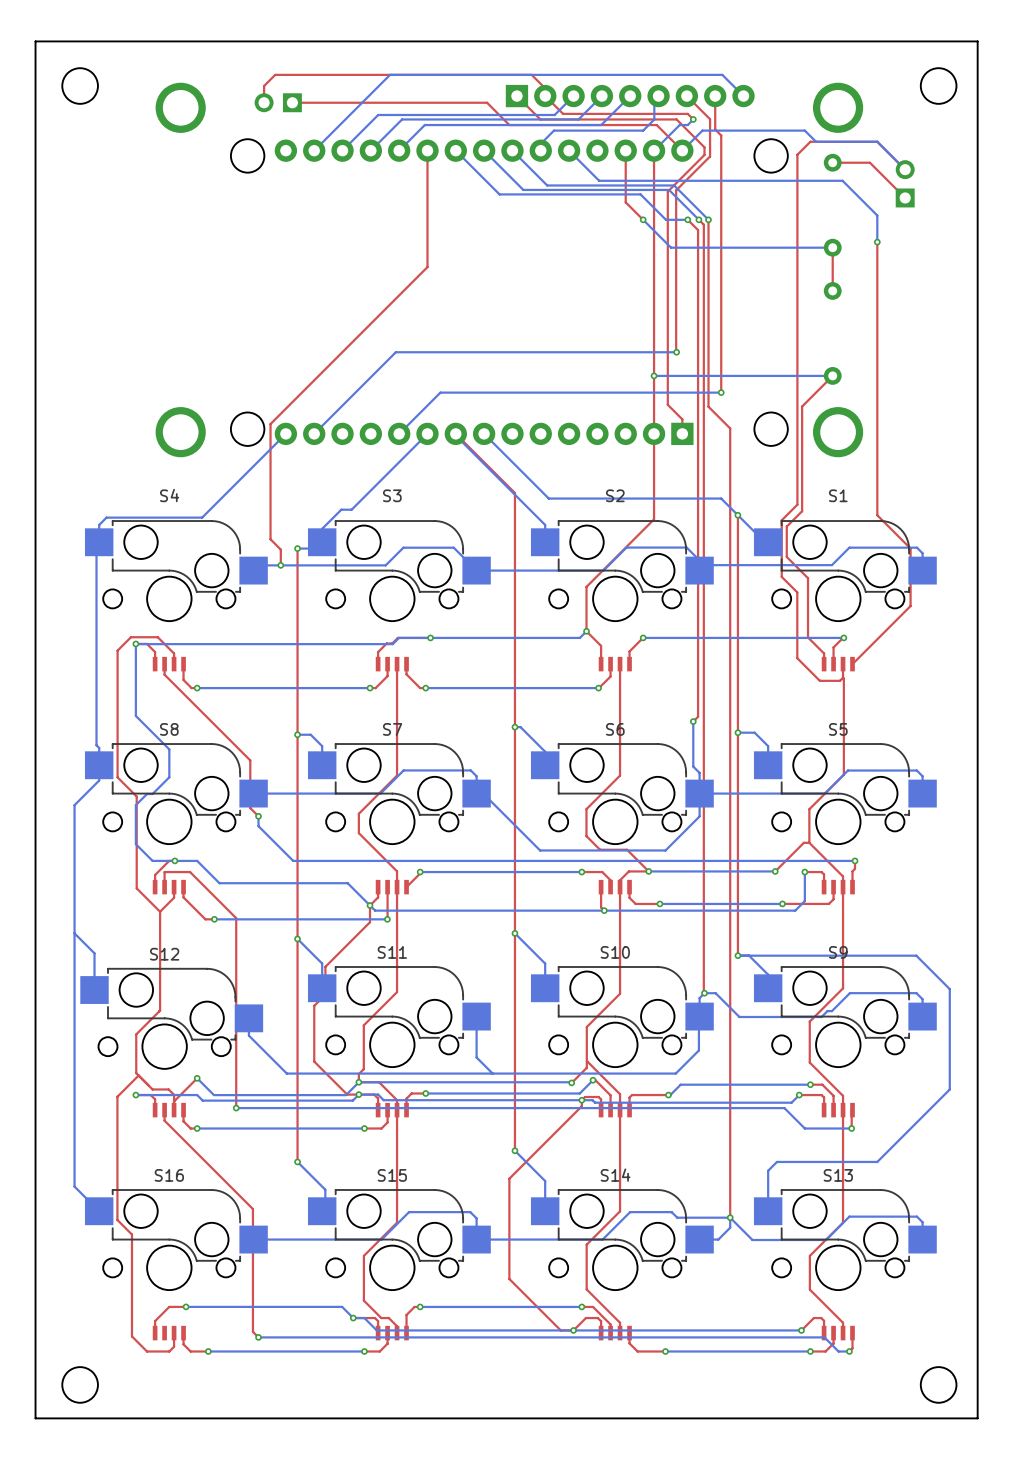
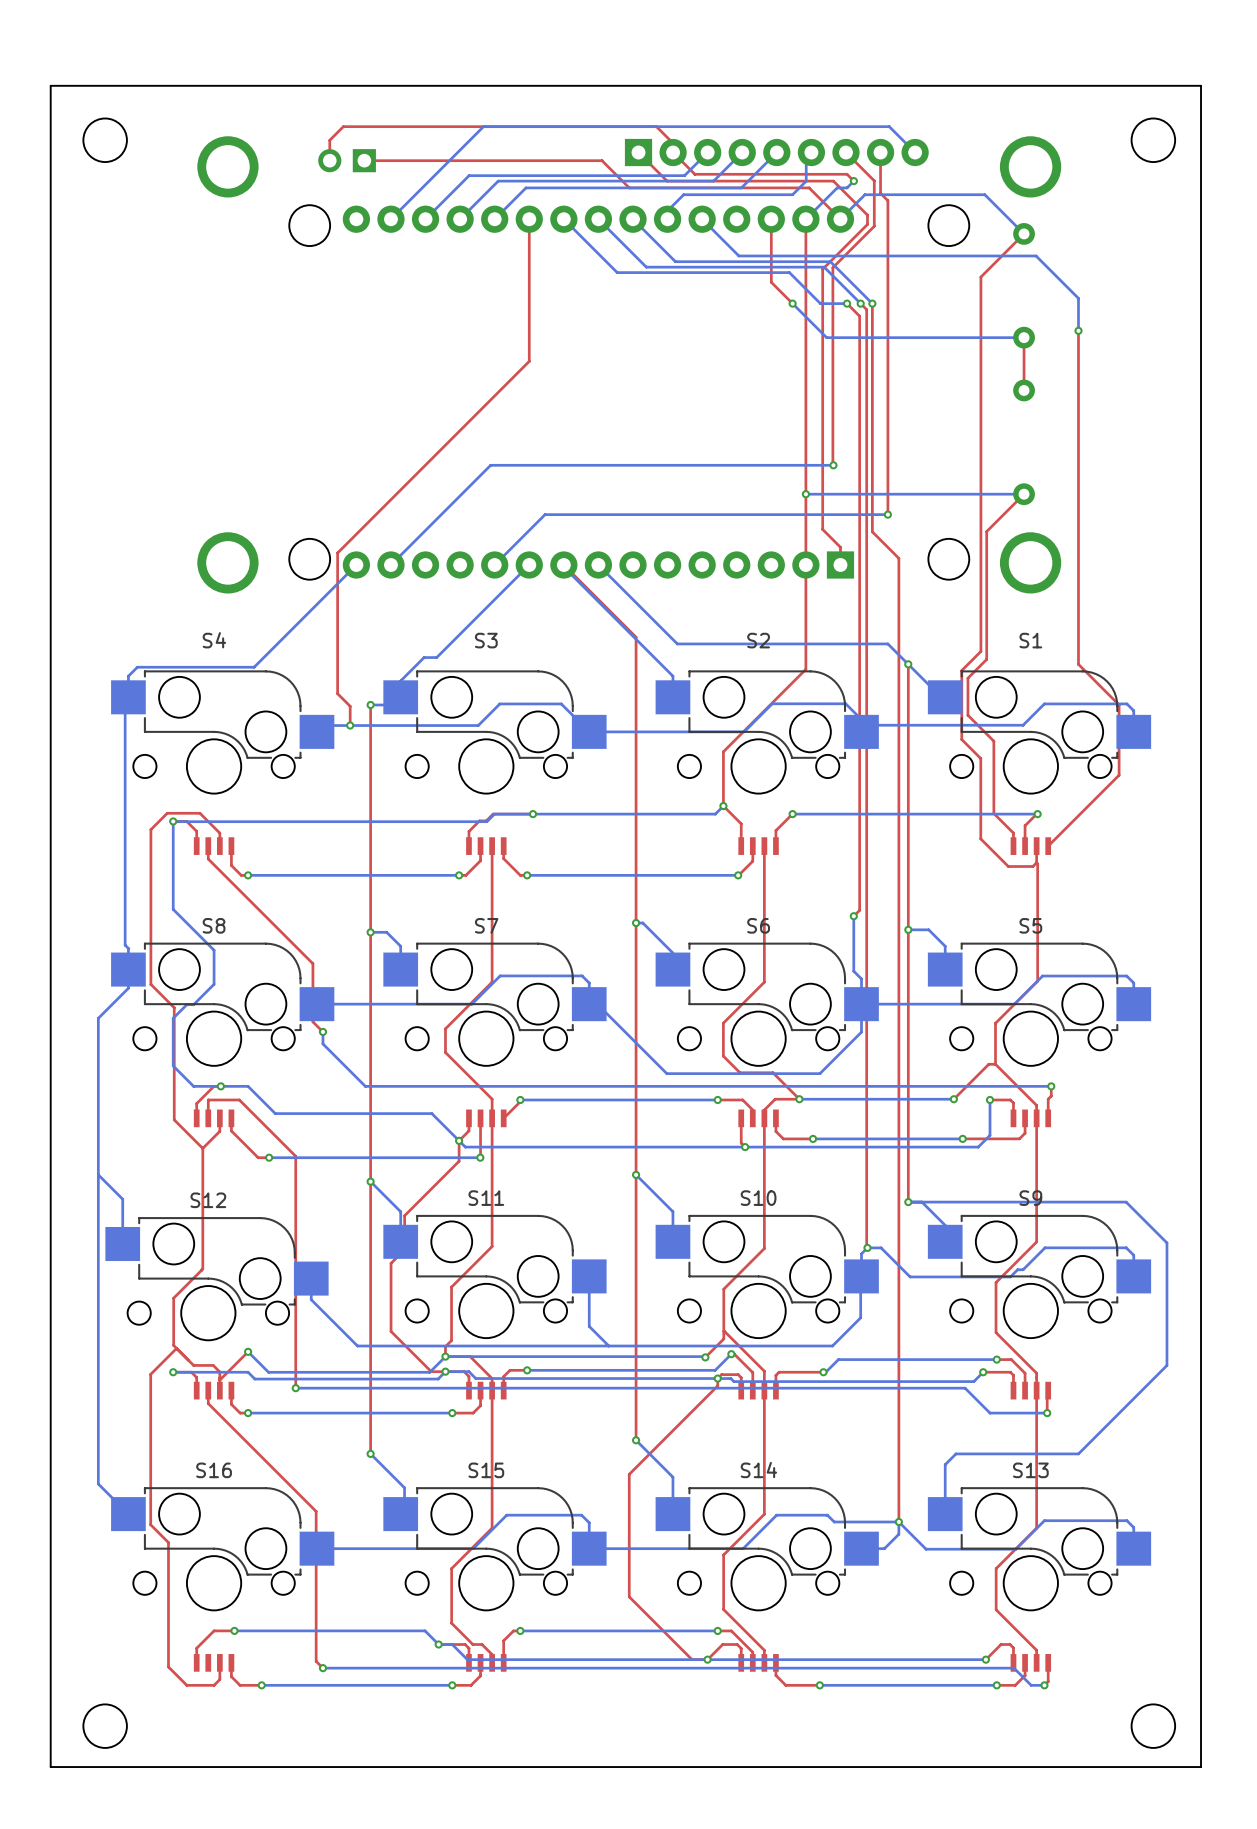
bottom track: (800, 130) (804, 130) (815, 141) (877, 141) (905, 169) -> (984, 194) (1024, 233)
top track: (832, 162) (869, 162) (905, 197) -> none
top track: (905, 169) (877, 141) (810, 141) (797, 154) (797, 198) -> (1024, 233) (980, 277)
part: (905, 183) -> none

